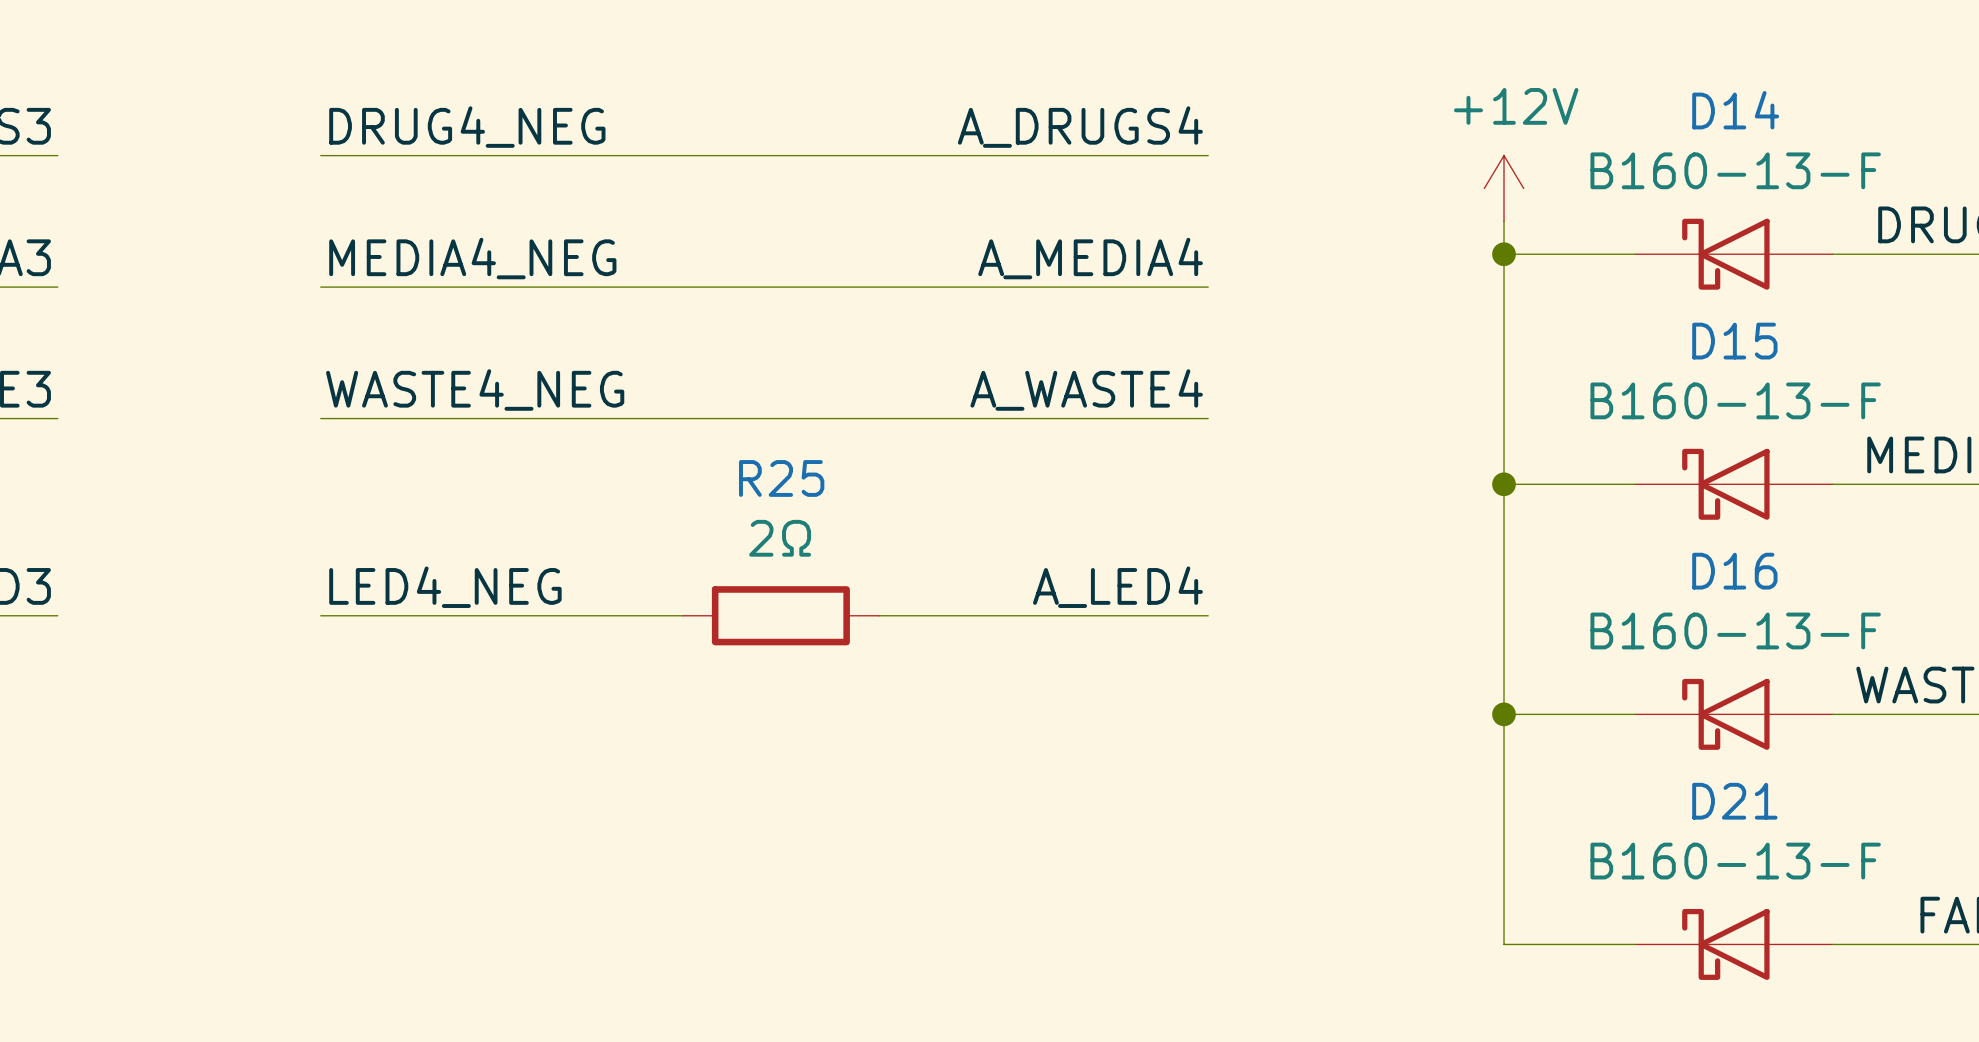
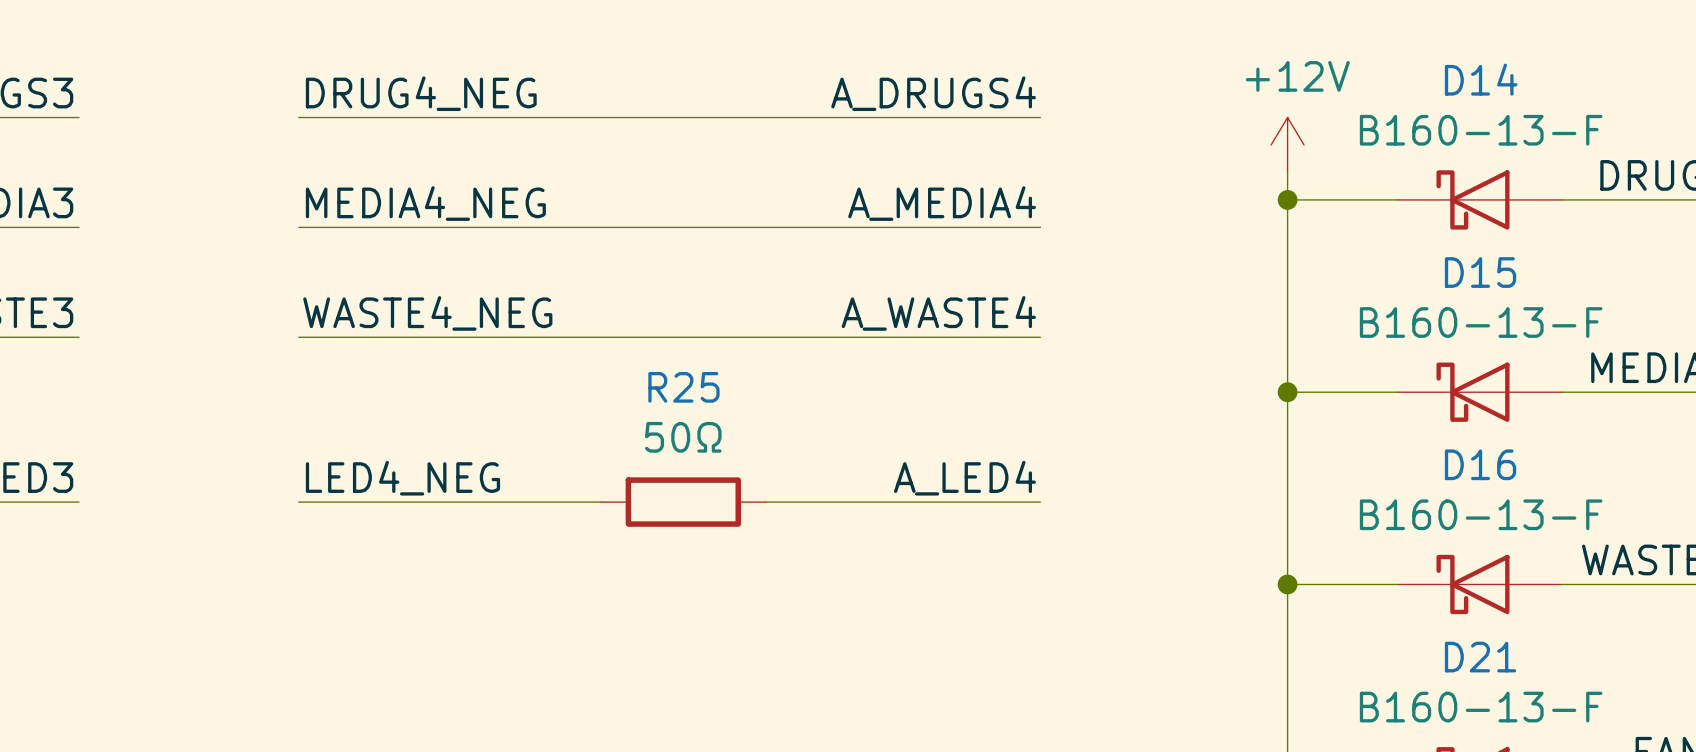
R25 value: 2Ω (780, 538) -> 50Ω (683, 437)

